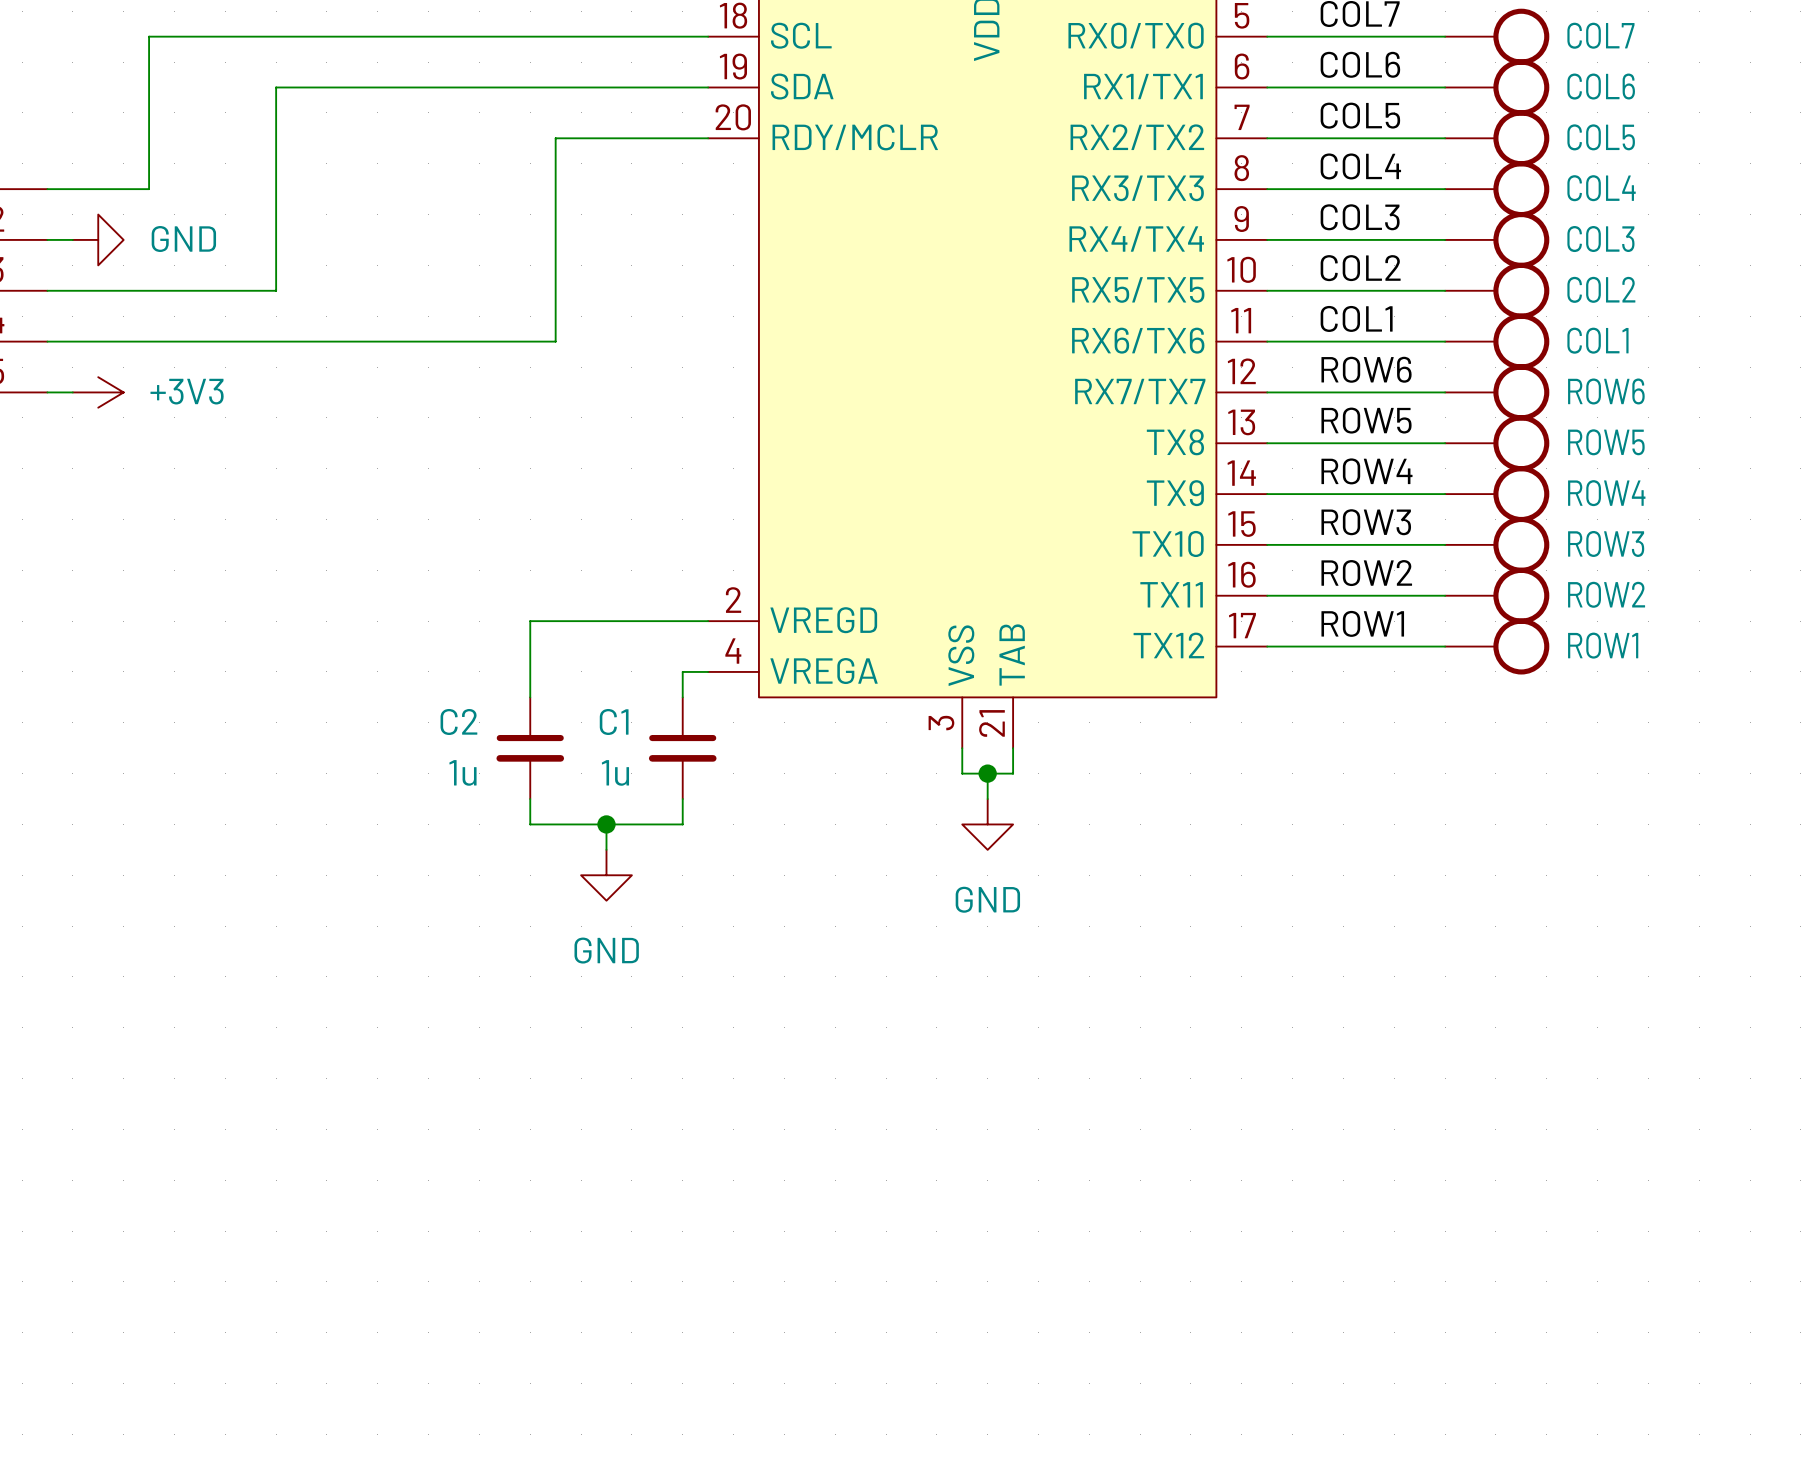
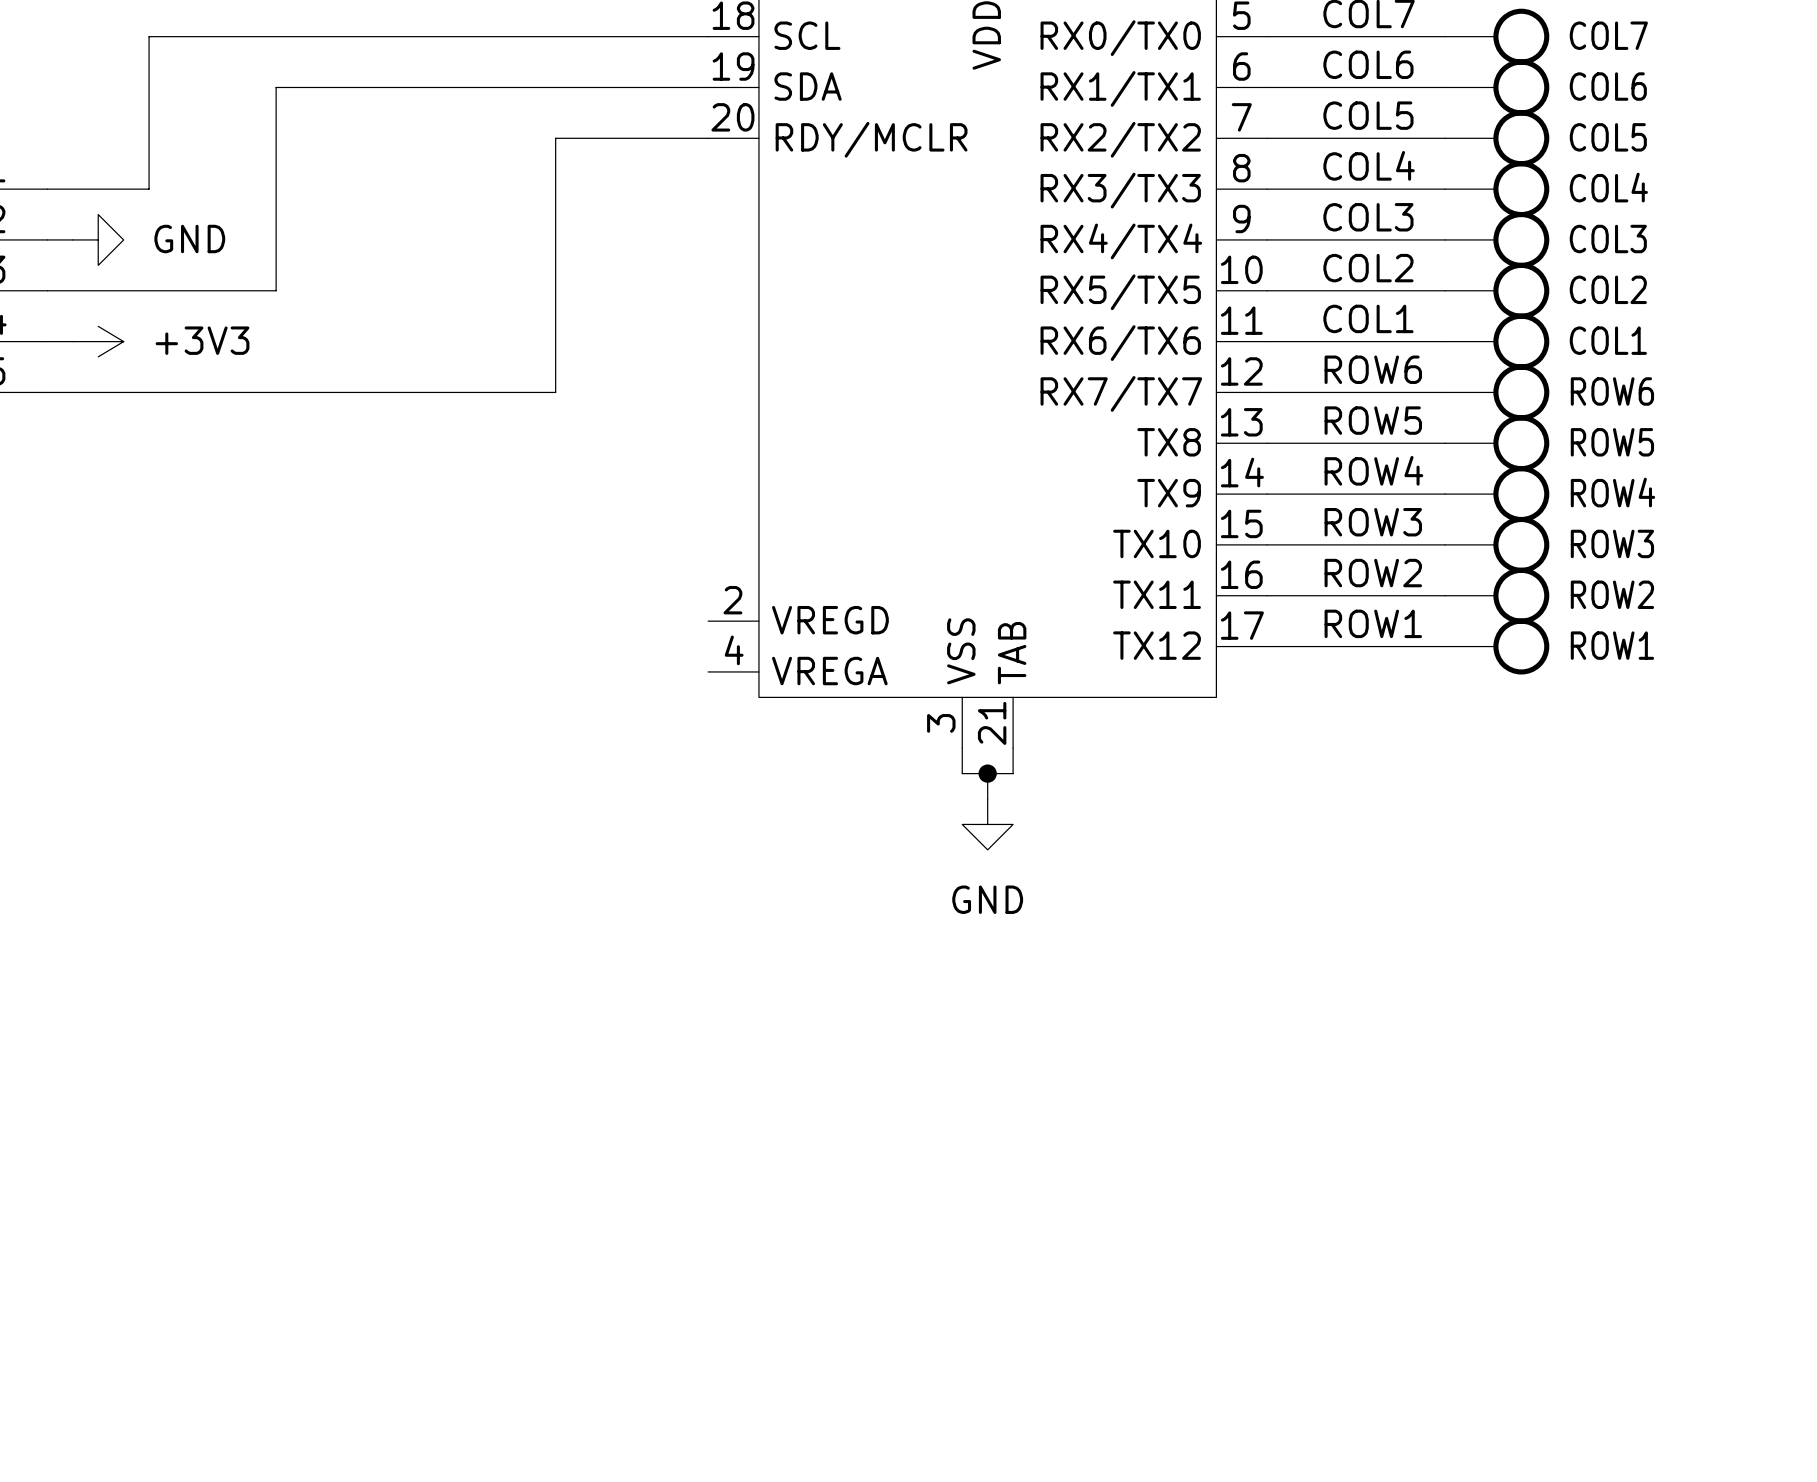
wire: (72, 341) (555, 341) -> (72, 392) (555, 392) (555, 341)
power symbol position: +3V3 (98, 392) -> +3V3 (98, 341)
wire: (708, 621) (530, 621) (530, 697) -> none
wire: (708, 671) (682, 671) (682, 697) -> none
C2: 1u (530, 748) -> none
C1: 1u (682, 748) -> none
wire: (530, 799) (530, 824) (682, 824) (682, 799) -> none
wire: (606, 824) (606, 849) -> none
junction: (606, 824) -> none
power symbol: GND (606, 875) -> none

